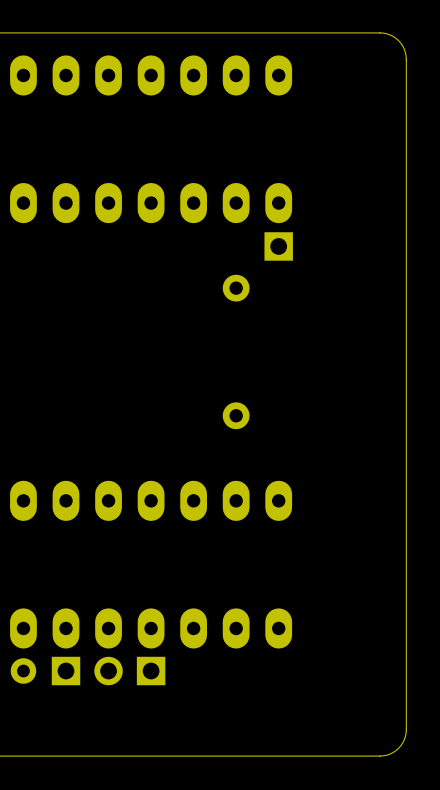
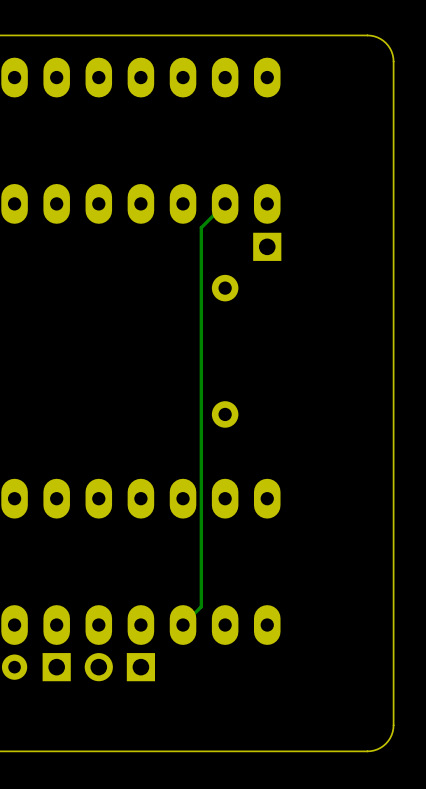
track: none -> (225, 203) (201, 227) (201, 606) (183, 625)

